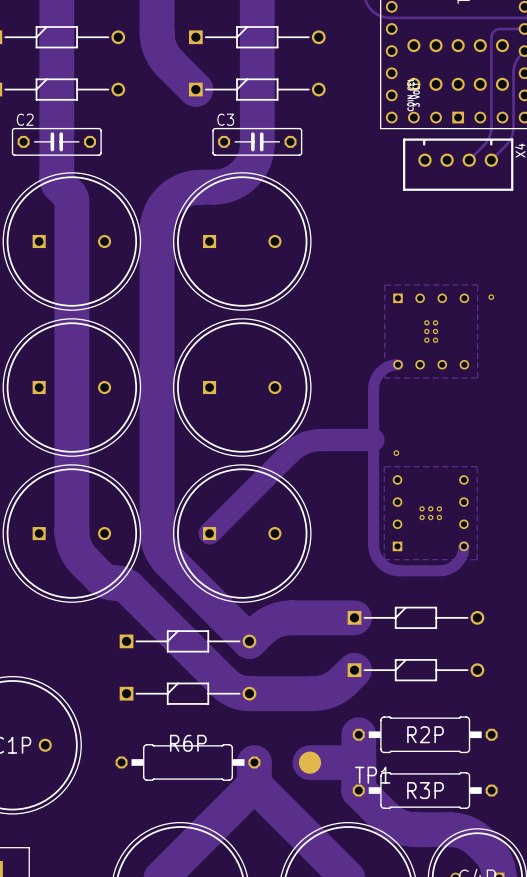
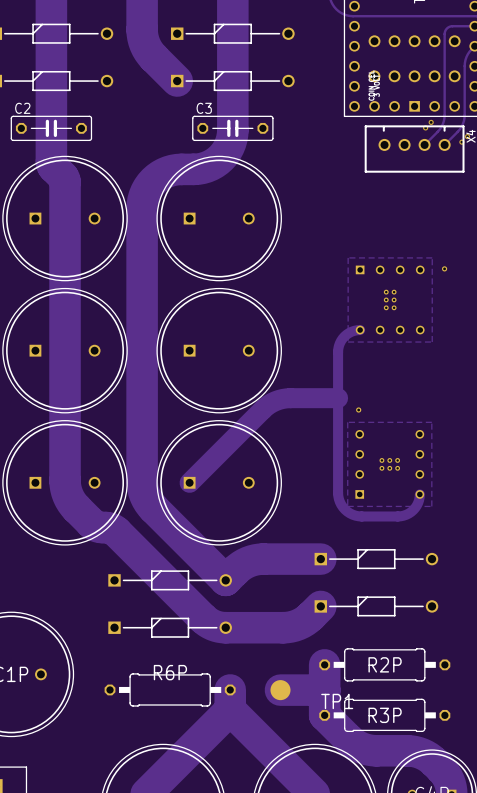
via: none -> (431, 122)
via: none -> (425, 127)
via: none -> (467, 136)
via: none -> (461, 142)

